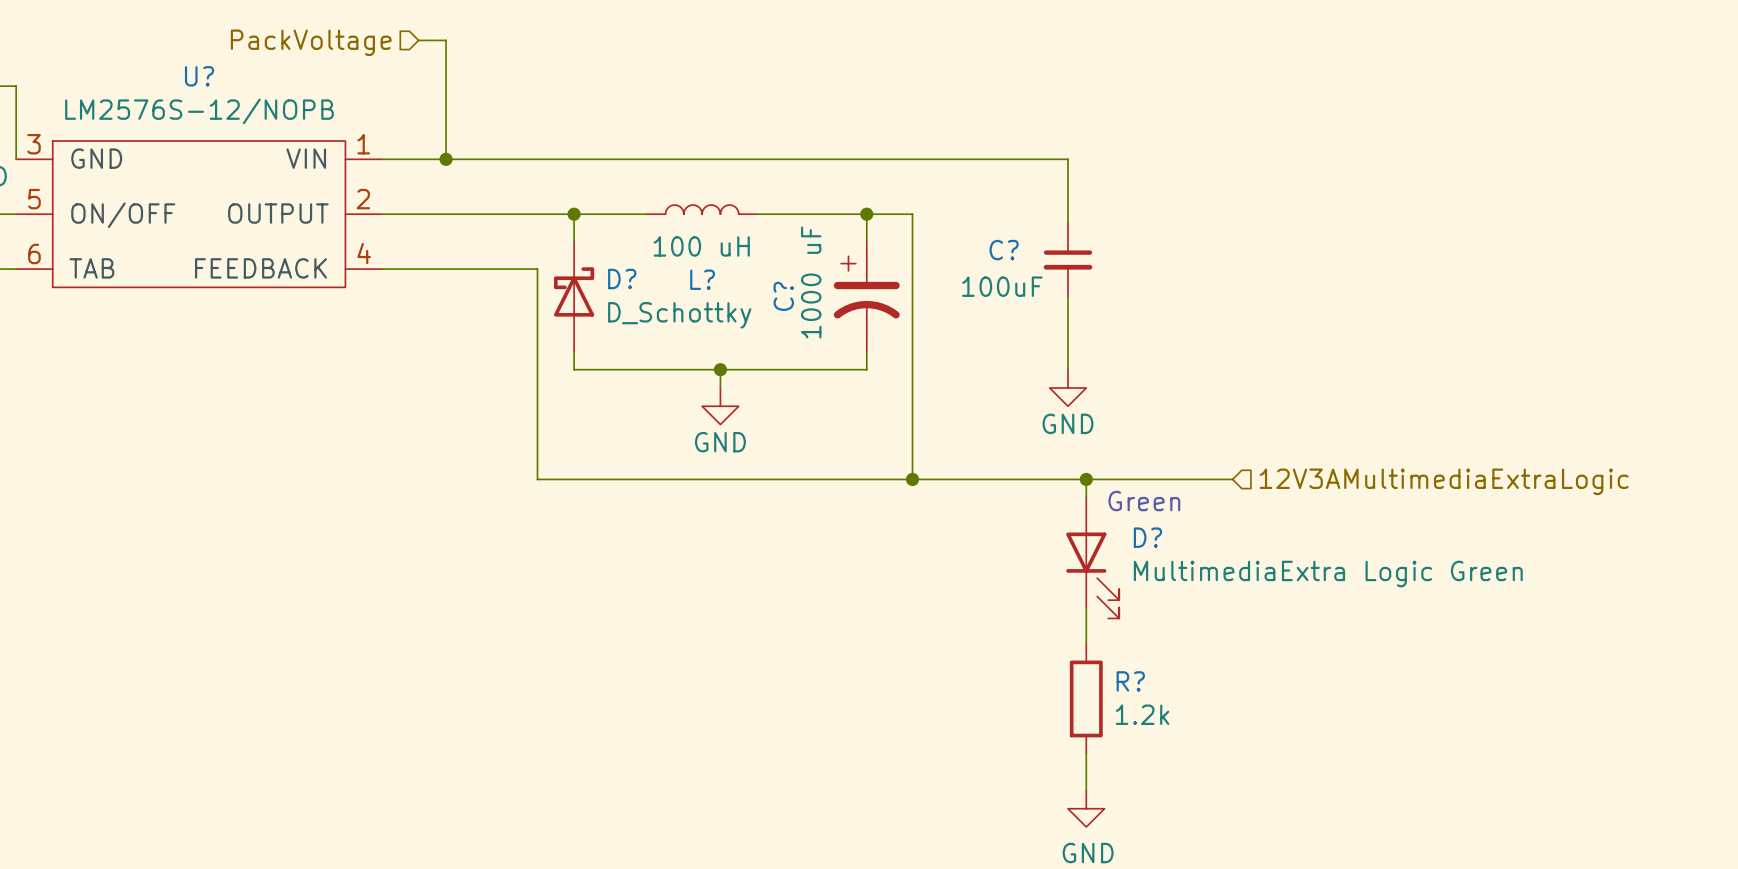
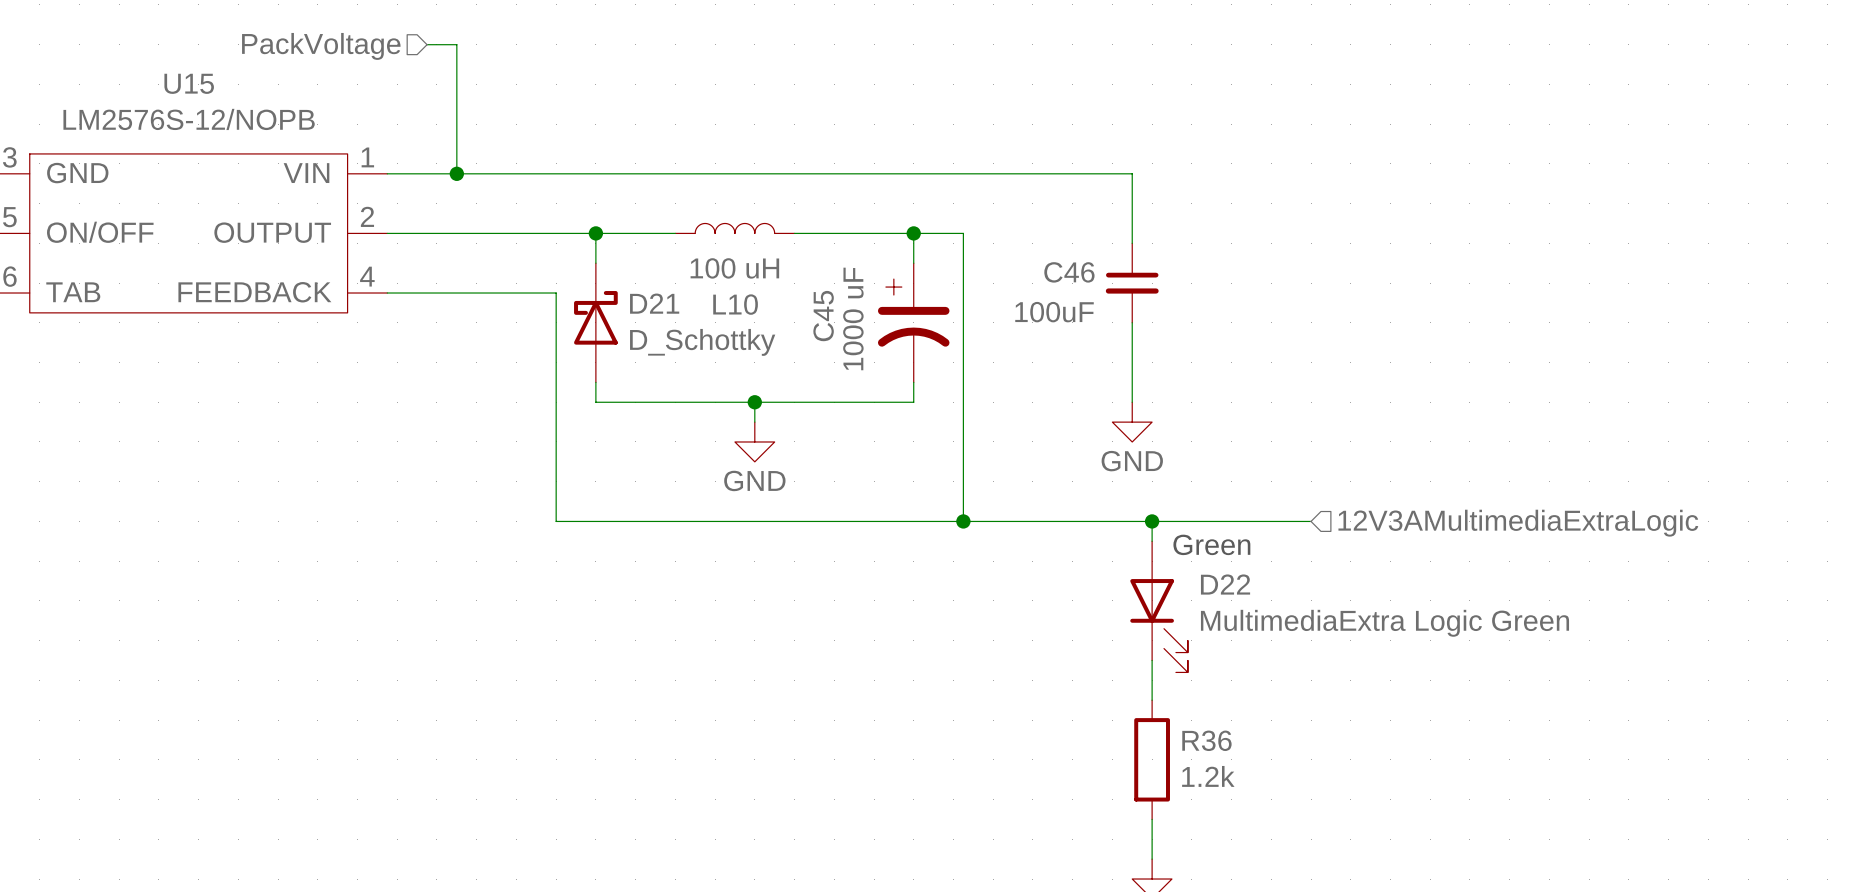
U? name: U? (199, 76) -> U15 (189, 83)
C? name: C? (1004, 250) -> C46 (1069, 272)
D? name: D? (622, 279) -> D21 (654, 303)
L? name: L? (702, 279) -> L10 (735, 304)
C? name: C? (783, 296) -> C45 (823, 316)
D? name: D? (1147, 537) -> D22 (1225, 584)
R? name: R? (1130, 681) -> R36 (1206, 740)

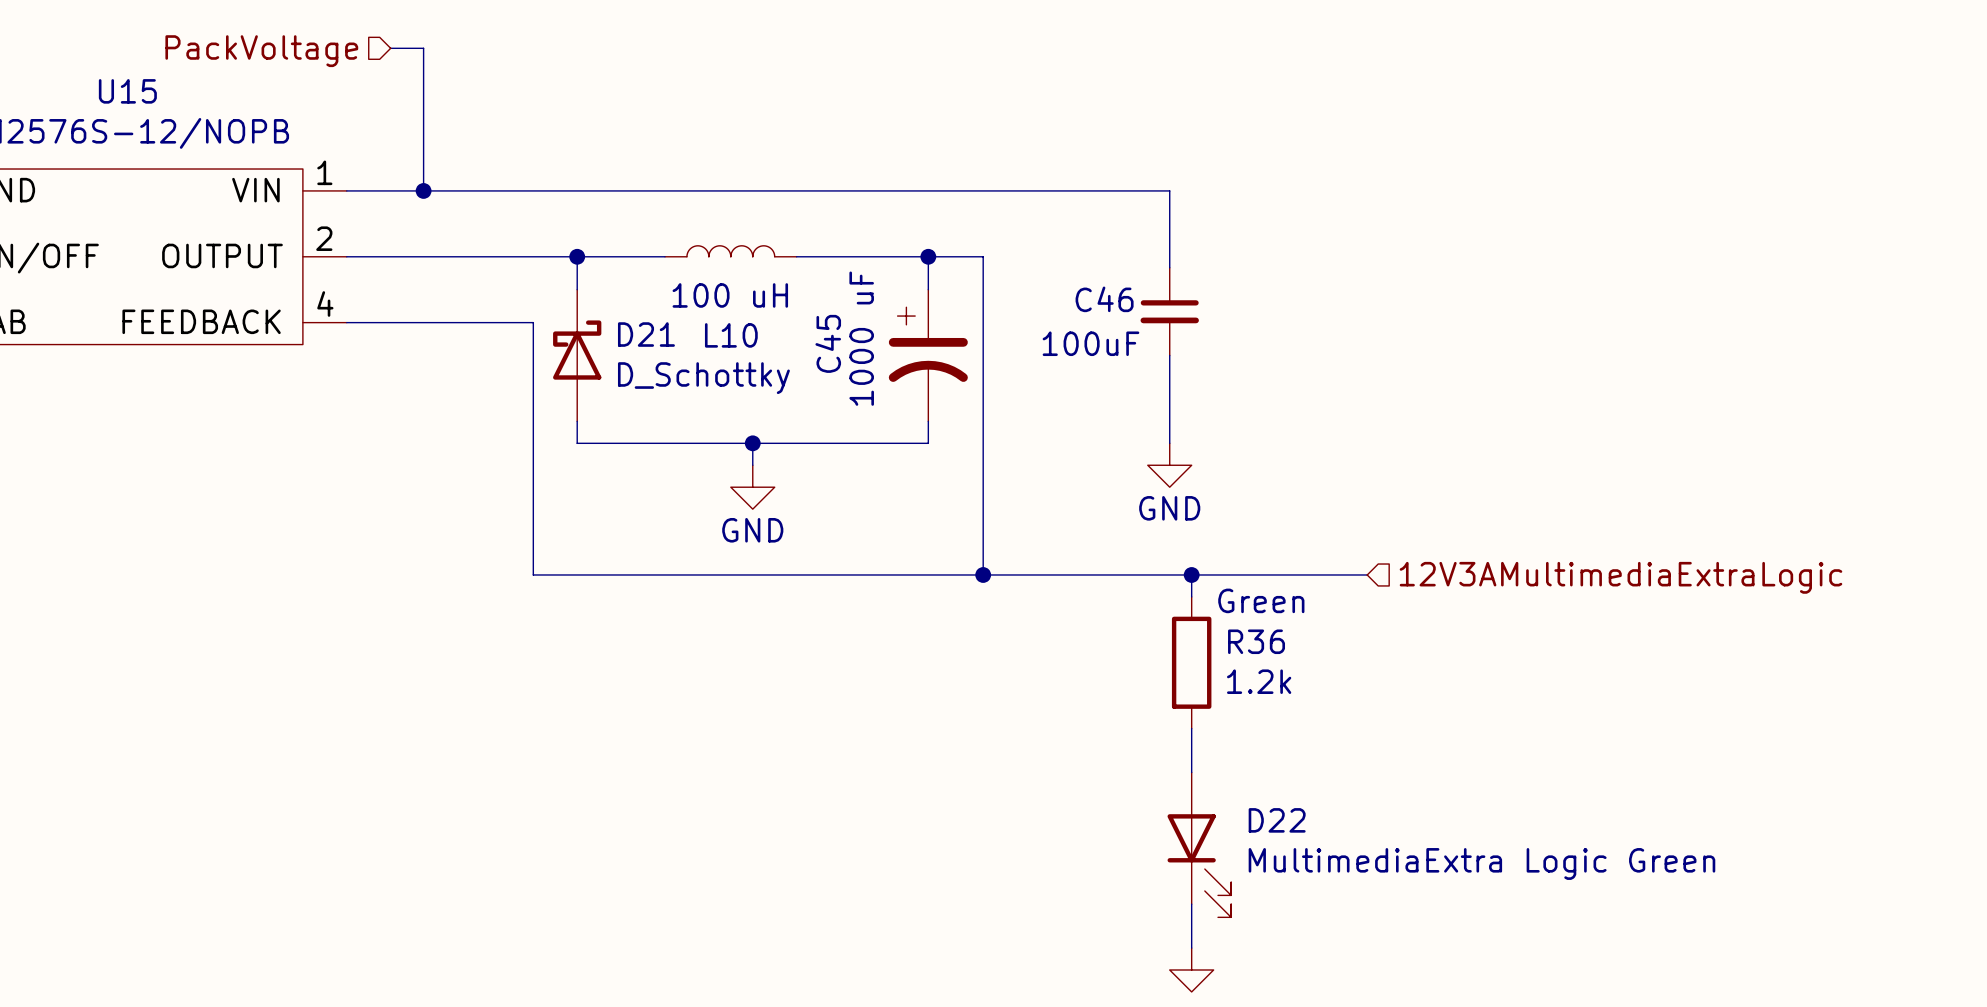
D22 position: (1159, 606) -> (1199, 844)
R36 position: (1152, 759) -> (1191, 662)

